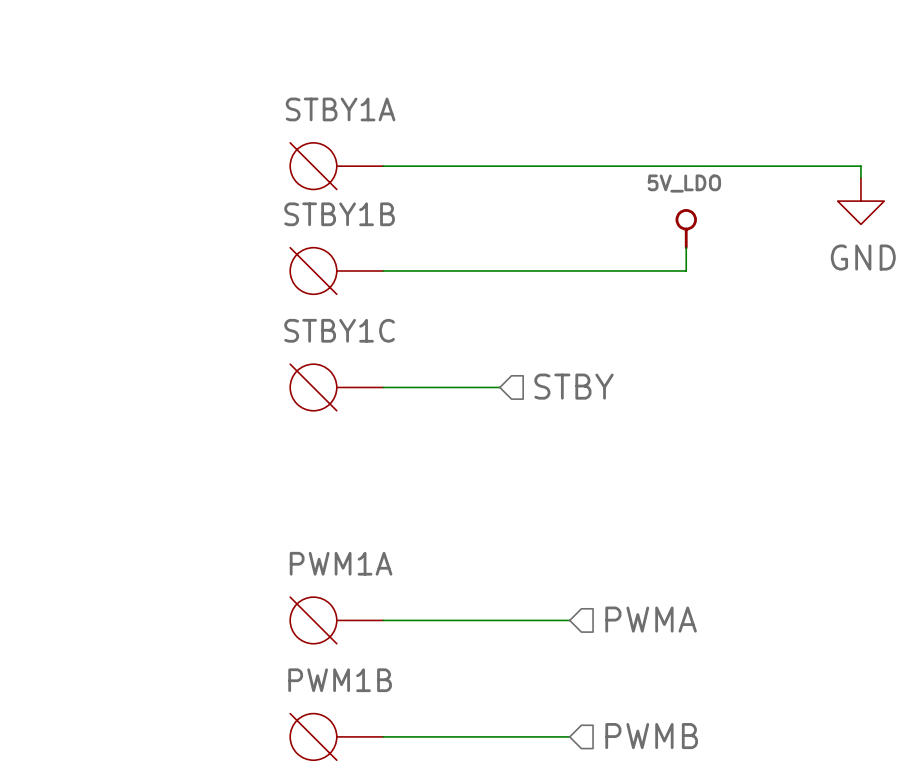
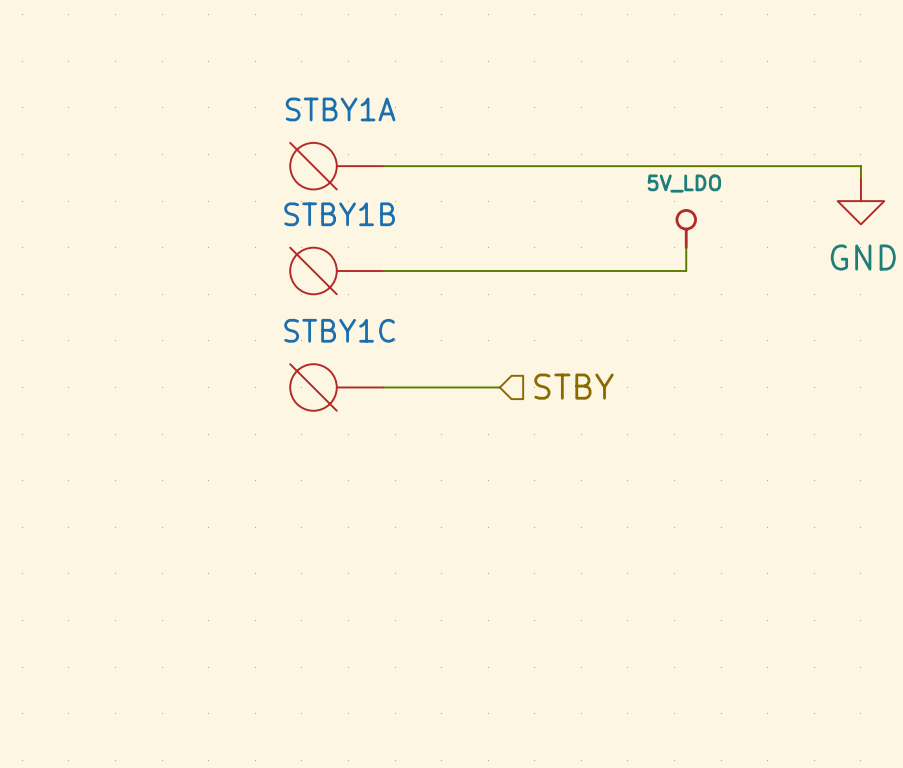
hierarchical label: PWMA (651, 619) -> none
PWM1A: (336, 620) -> none
wire: (383, 620) (569, 620) -> none
PWM1B: (336, 736) -> none
wire: (383, 736) (569, 736) -> none
hierarchical label: PWMB (651, 736) -> none

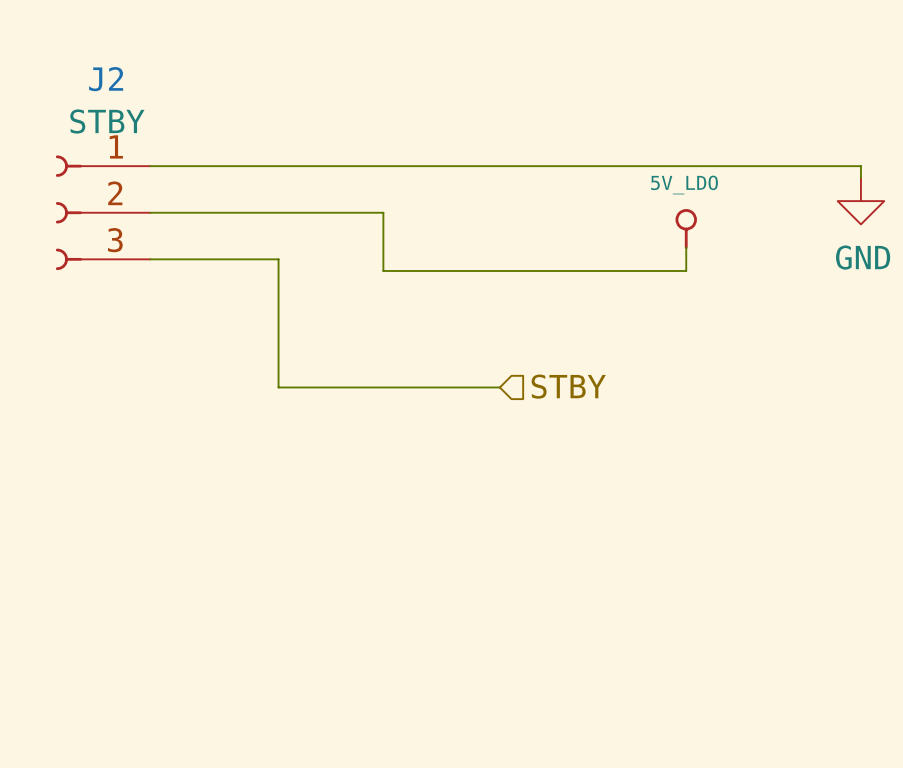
wire: none -> (150, 166) (383, 166)
STBY1A: (336, 166) -> none
J2: none -> STBY (103, 212)
wire: none -> (150, 212) (383, 212) (383, 270)
wire: none -> (150, 259) (278, 259) (278, 387) (383, 387)
STBY1B: (336, 270) -> none
STBY1C: (336, 387) -> none

